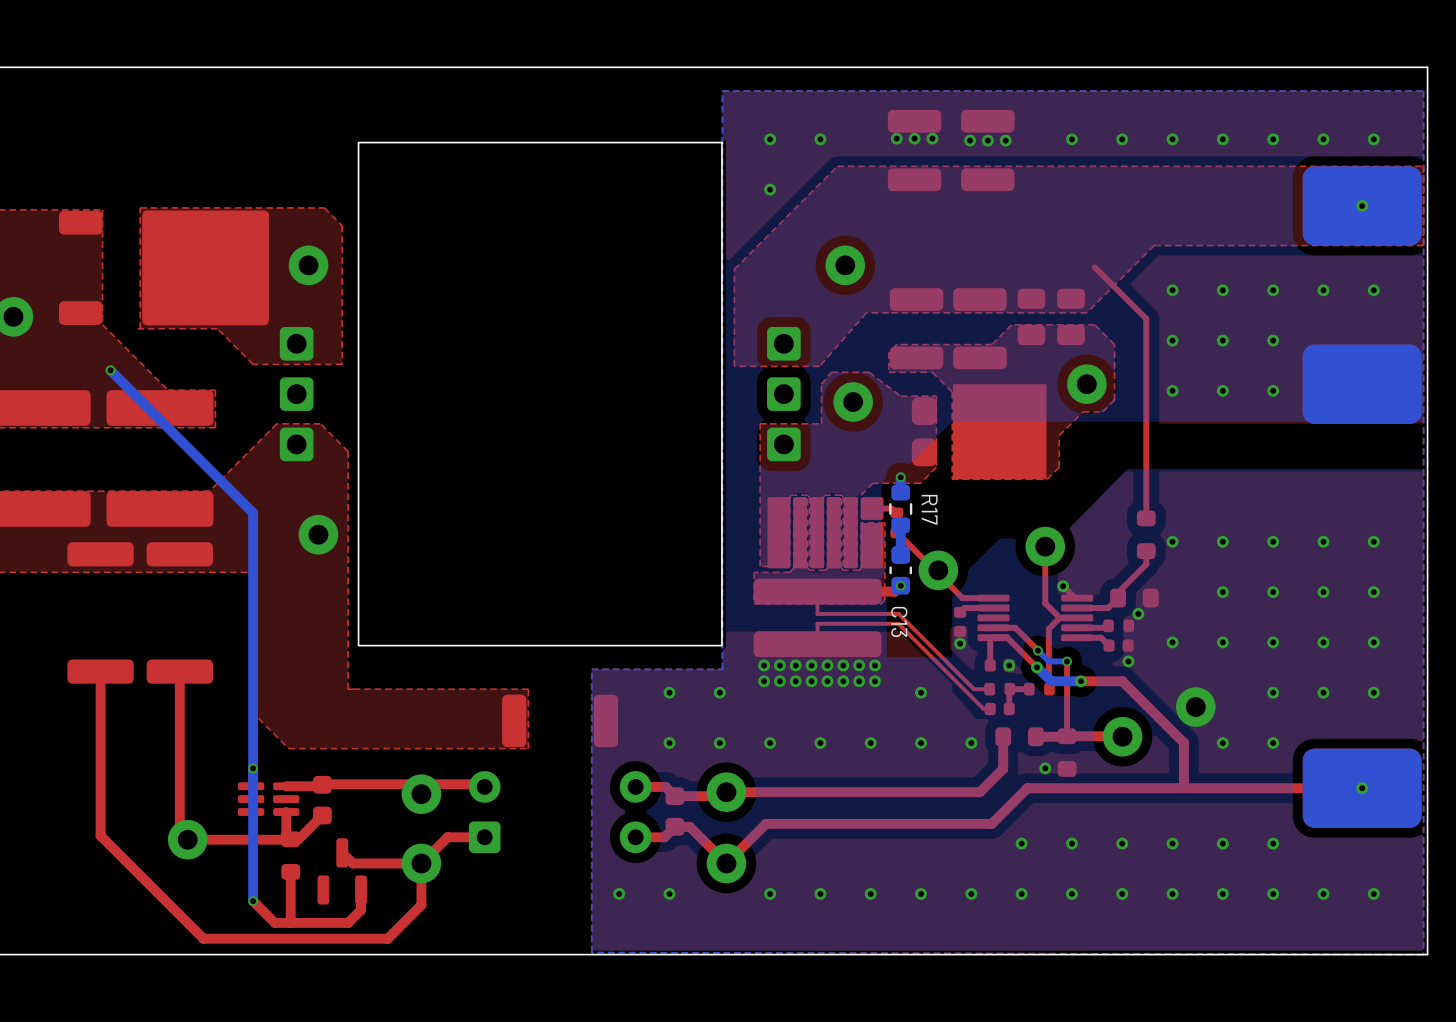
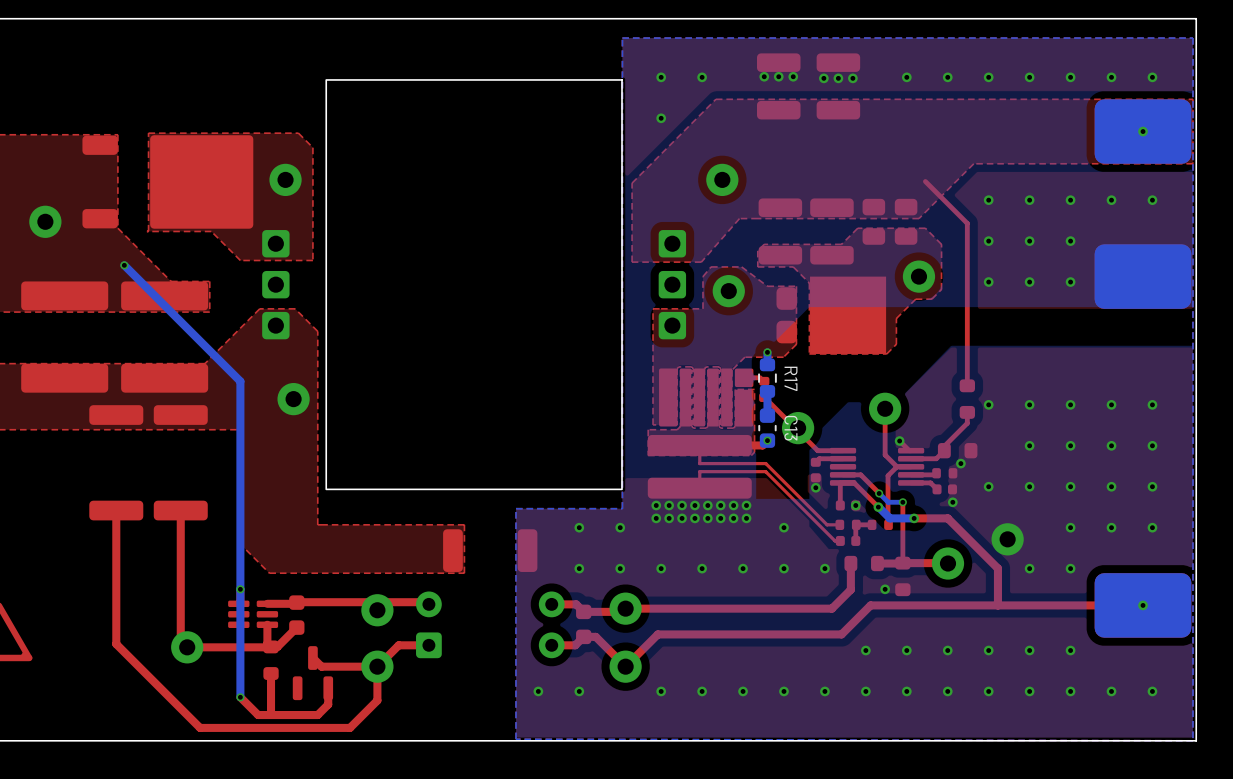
C13 name position: C13 (899, 621) -> C13 (790, 428)

